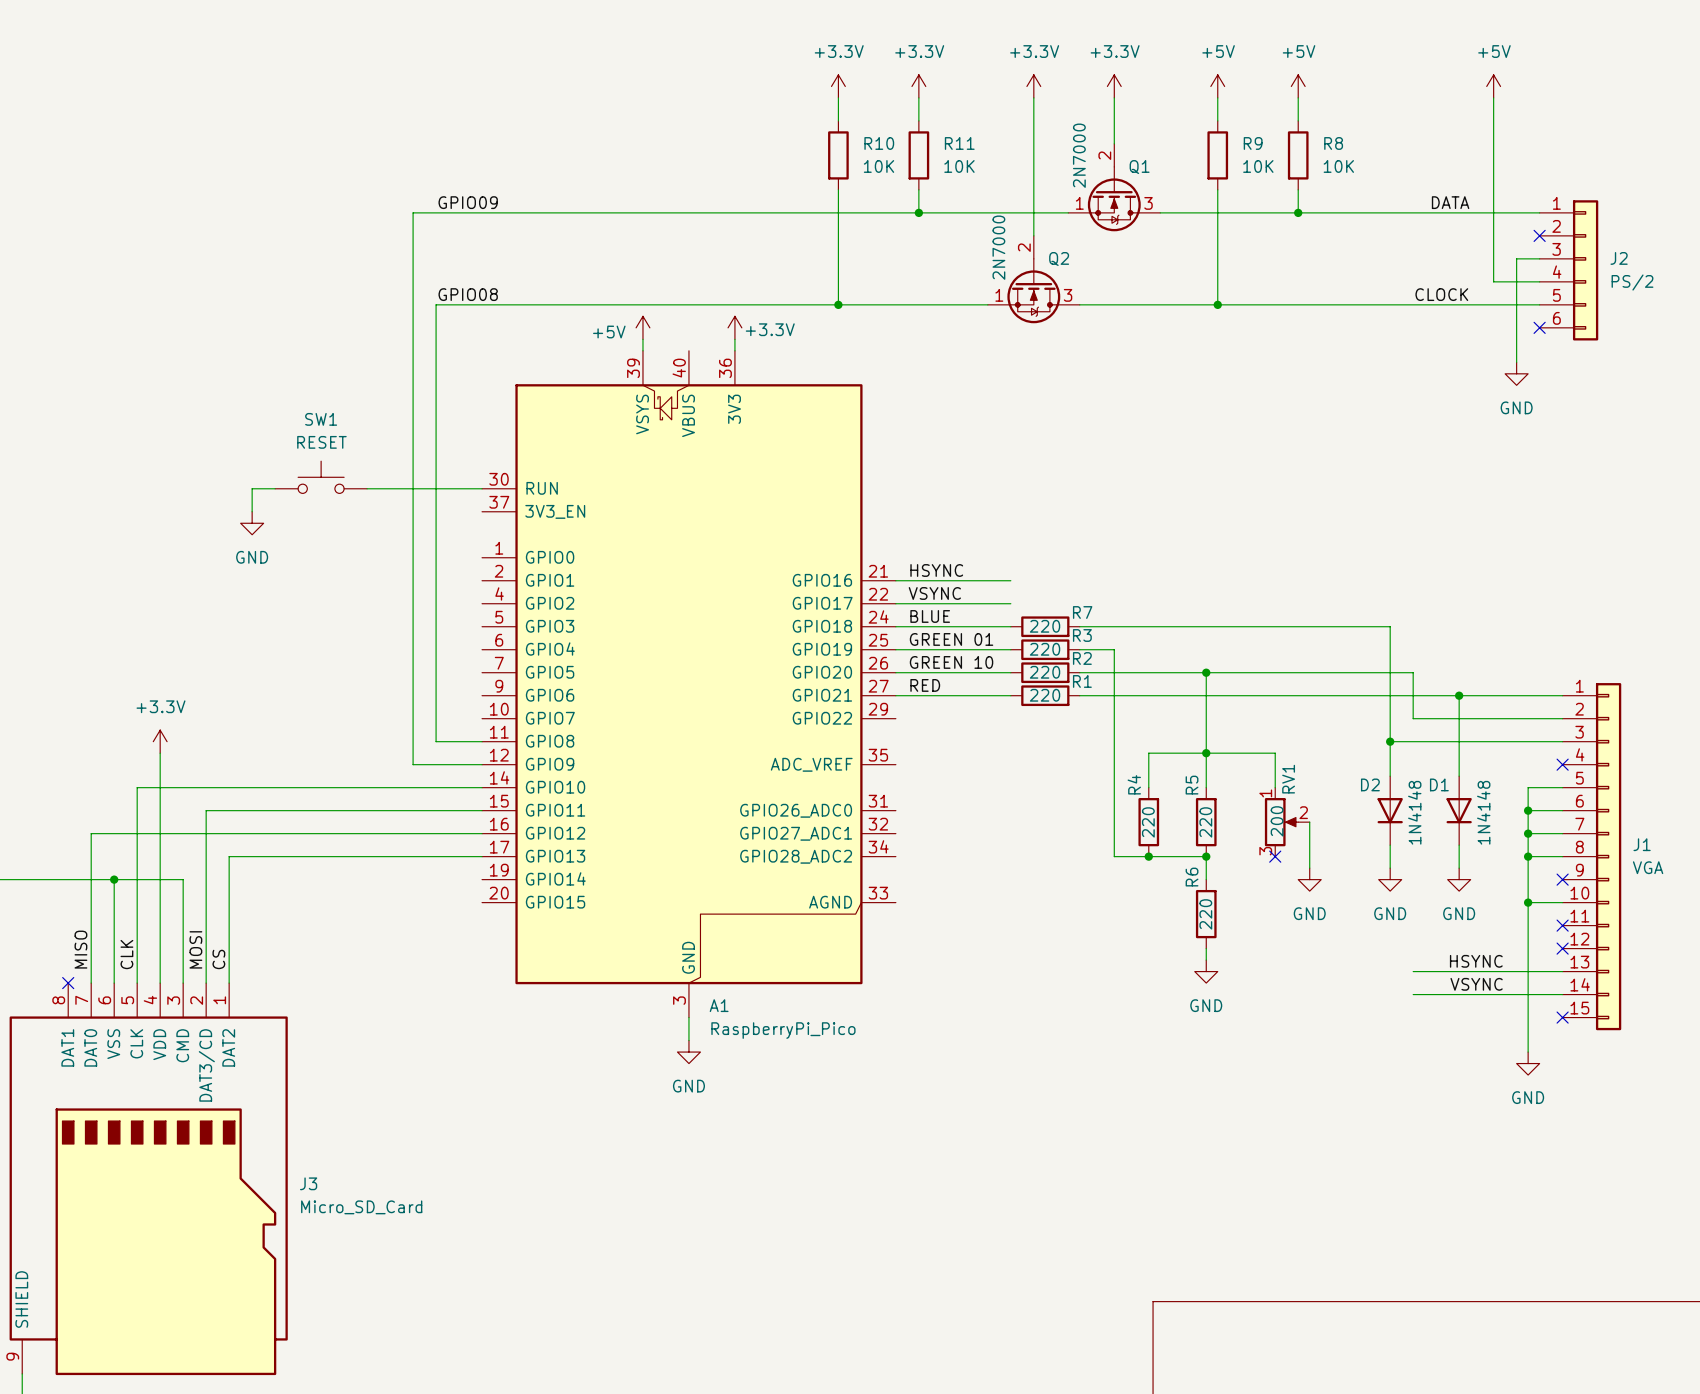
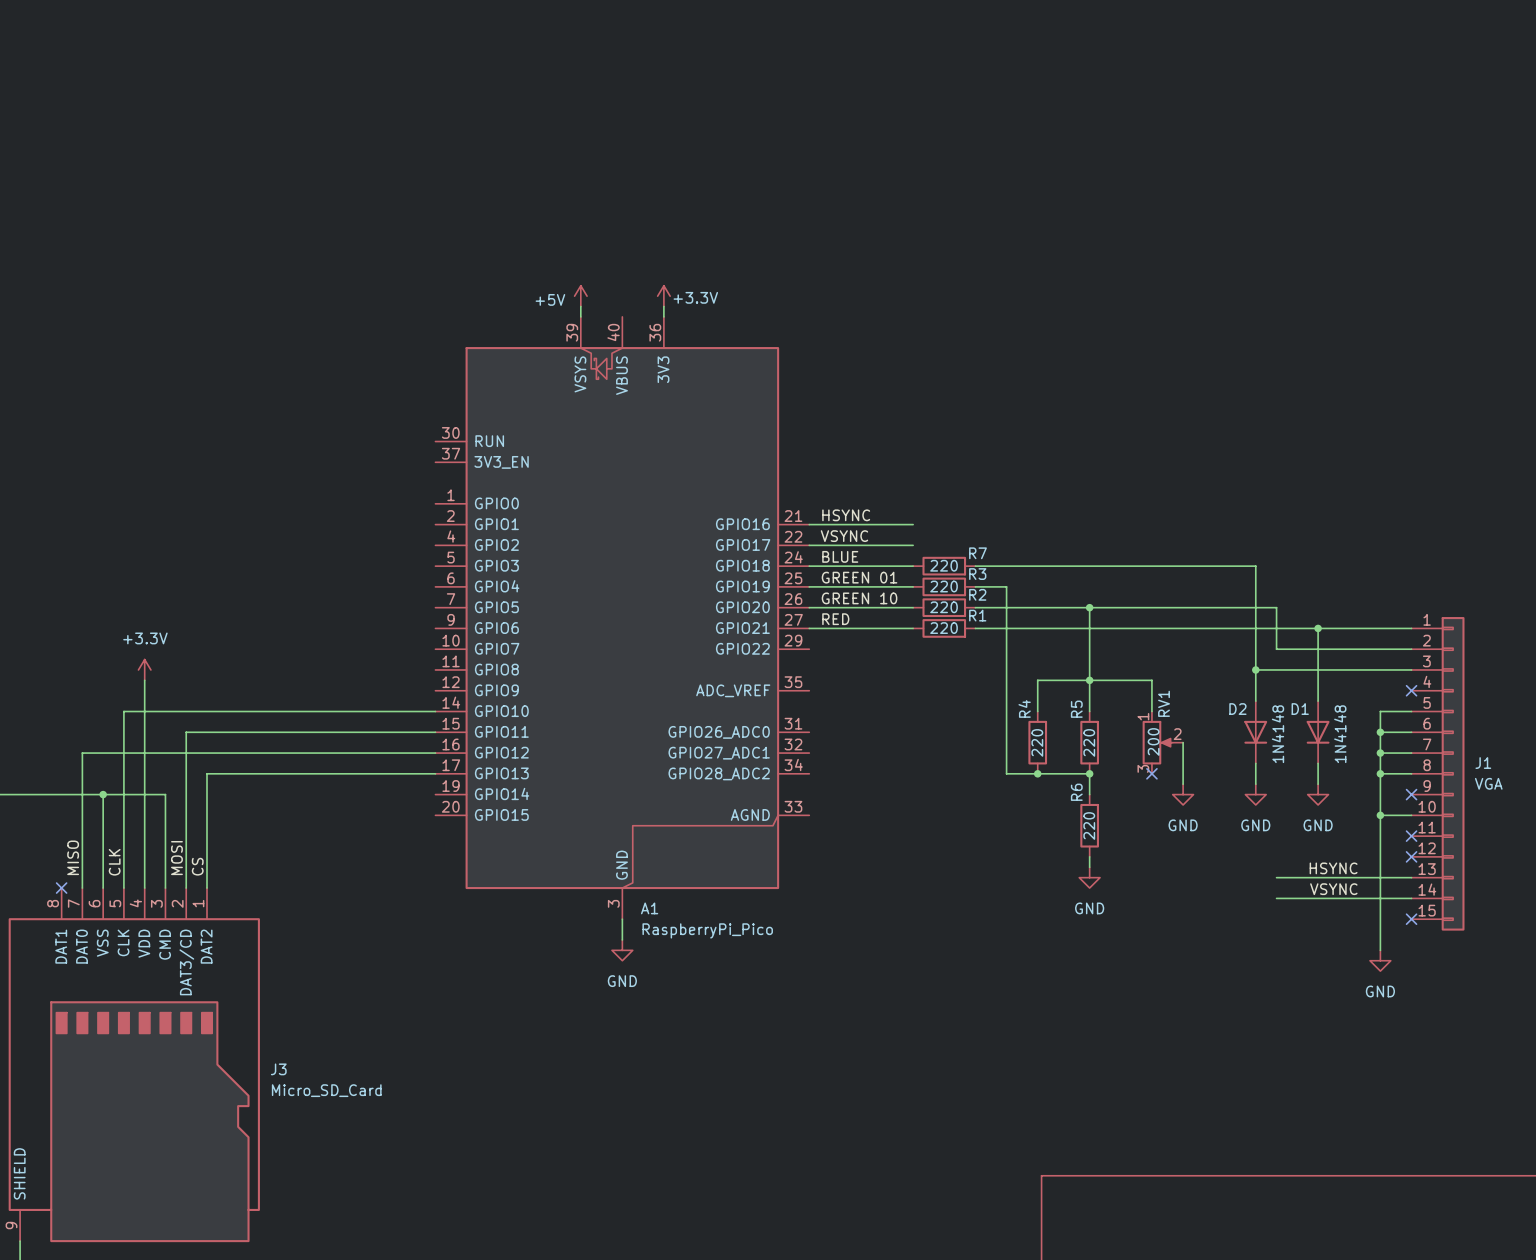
power symbol: +3.3V (838, 86) -> none
power symbol: +3.3V (918, 86) -> none
power symbol: +3.3V (1033, 86) -> none
power symbol: +3.3V (1114, 86) -> none
power symbol: +5V (1217, 86) -> none
power symbol: +5V (1298, 86) -> none
power symbol: +5V (1493, 86) -> none
wire: (838, 97) (838, 120) -> none
wire: (918, 97) (918, 120) -> none
wire: (1033, 97) (1033, 235) -> none
wire: (1114, 97) (1114, 143) -> none
wire: (1217, 97) (1217, 120) -> none
wire: (1298, 97) (1298, 120) -> none
wire: (1493, 97) (1493, 281) (1539, 281) -> none
R10: 10K (838, 155) -> none
R11: 10K (918, 155) -> none
R9: 10K (1217, 155) -> none
R8: 10K (1298, 155) -> none
Q1: 2N7000 (1114, 187) -> none
wire: (838, 189) (838, 304) -> none
wire: (918, 189) (918, 212) -> none
wire: (1217, 189) (1217, 304) -> none
wire: (1298, 189) (1298, 212) -> none
label: GPIO09 (468, 202) -> none
label: DATA (1450, 202) -> none
junction: (918, 212) -> none
wire: (1068, 212) (413, 212) (413, 764) (482, 764) -> none
wire: (1160, 212) (1539, 212) -> none
junction: (1298, 212) -> none
no-connect mark: (1539, 235) -> none
wire: (1539, 258) (1516, 258) (1516, 362) -> none
J2: PS/2 (1568, 270) -> none
Q2: 2N7000 (1033, 279) -> none
label: GPIO08 (468, 294) -> none
label: CLOCK (1441, 294) -> none
junction: (838, 304) -> none
wire: (987, 304) (436, 304) (436, 741) (482, 741) -> none
wire: (1079, 304) (1539, 304) -> none
junction: (1217, 304) -> none
no-connect mark: (1539, 327) -> none
power symbol: GND (1516, 373) -> none
SW1: RESET (321, 477) -> none
wire: (275, 488) (252, 488) (252, 511) -> none
wire: (367, 488) (482, 488) -> none
power symbol: GND (252, 523) -> none

